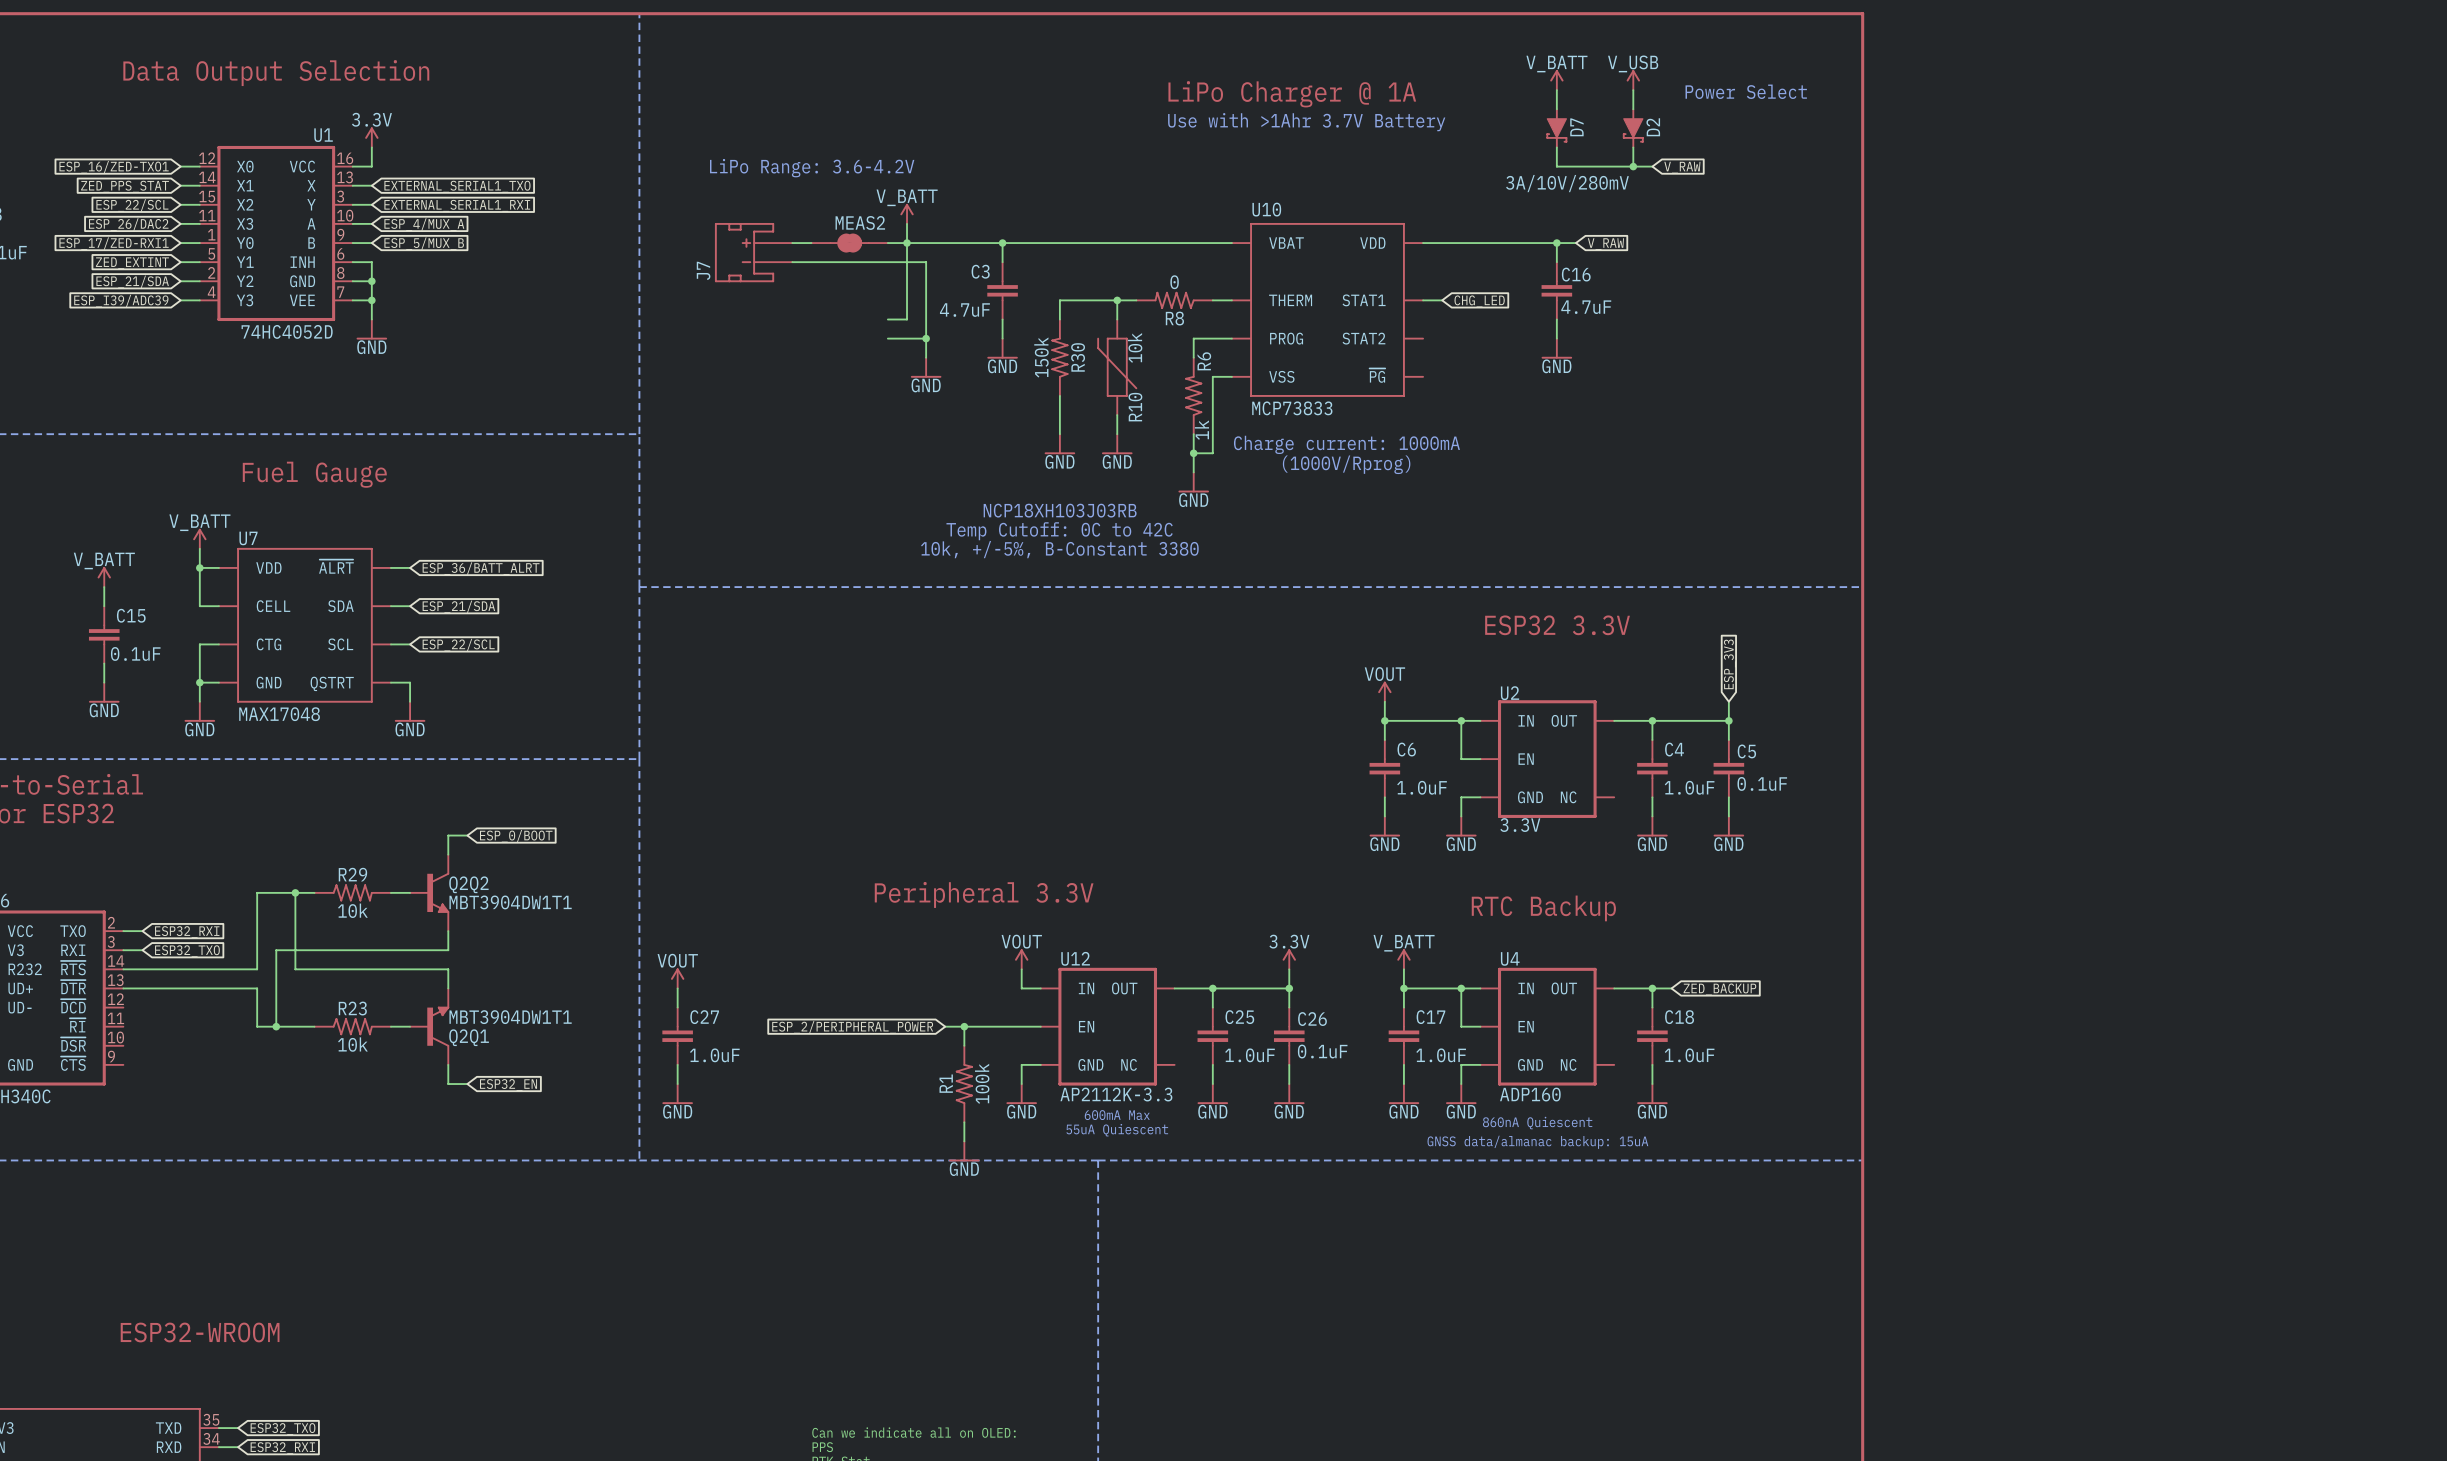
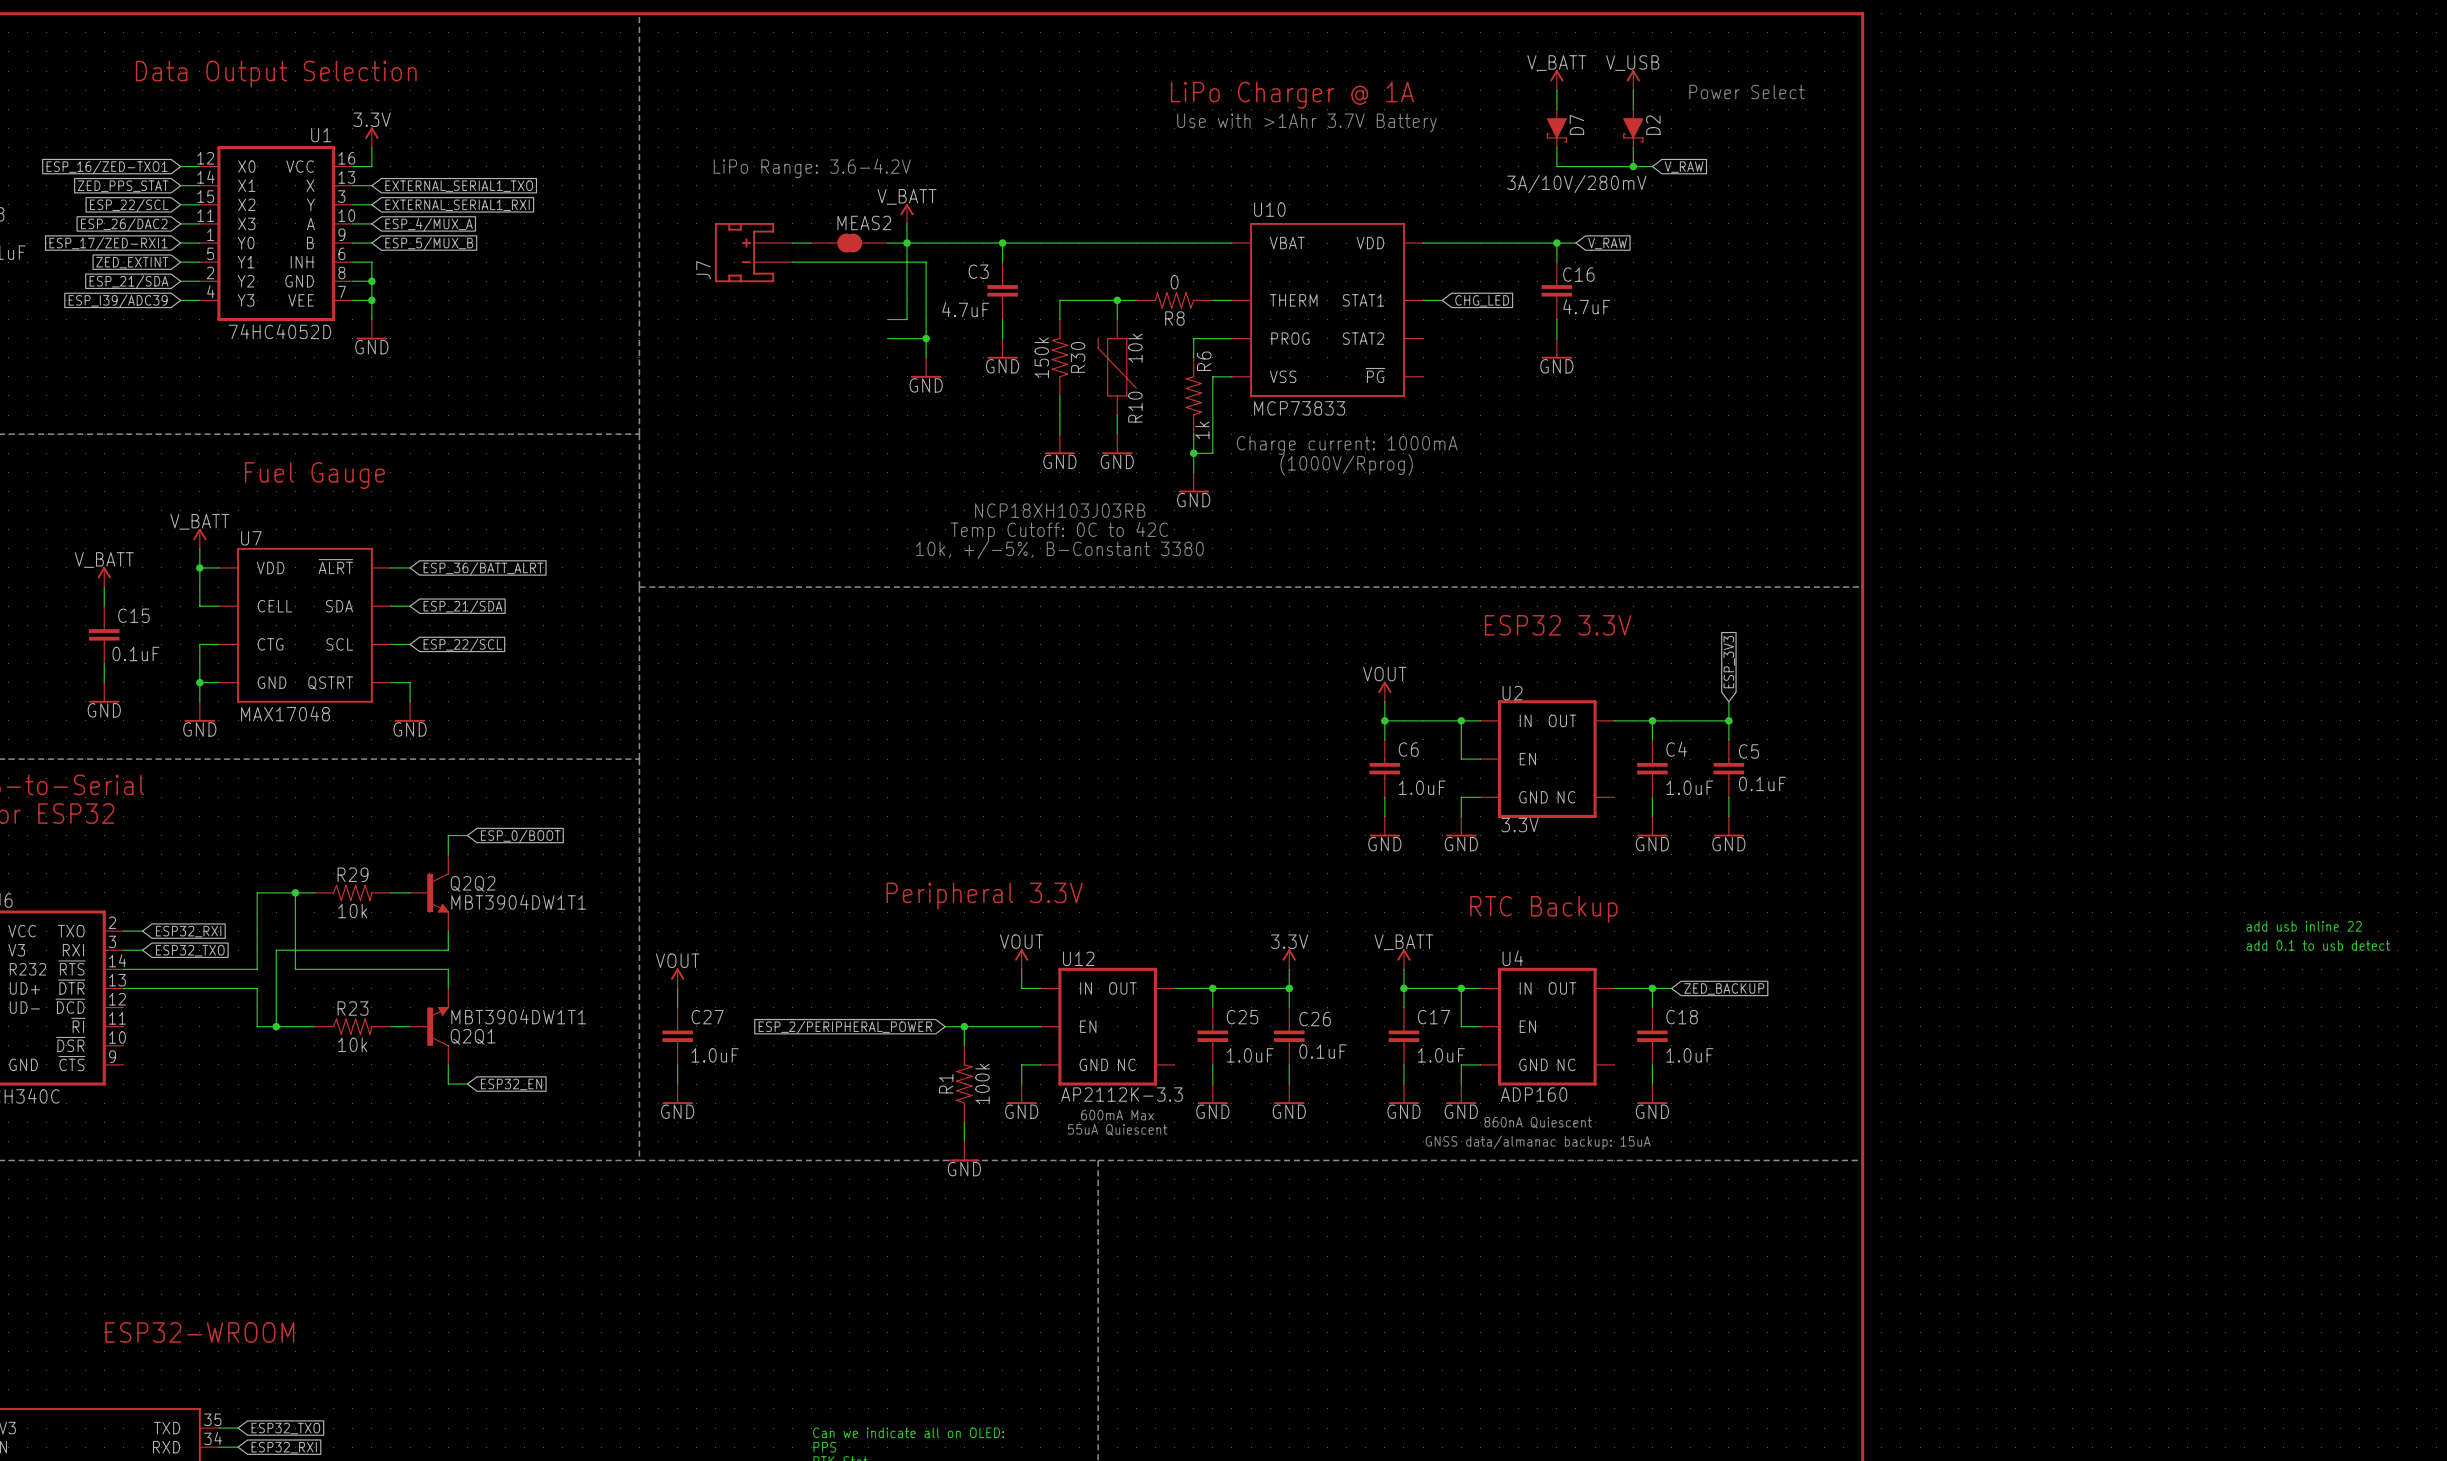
text: none -> add usb inline 22 (2304, 926)
text: none -> add 0.1 to usb detect (2318, 945)

